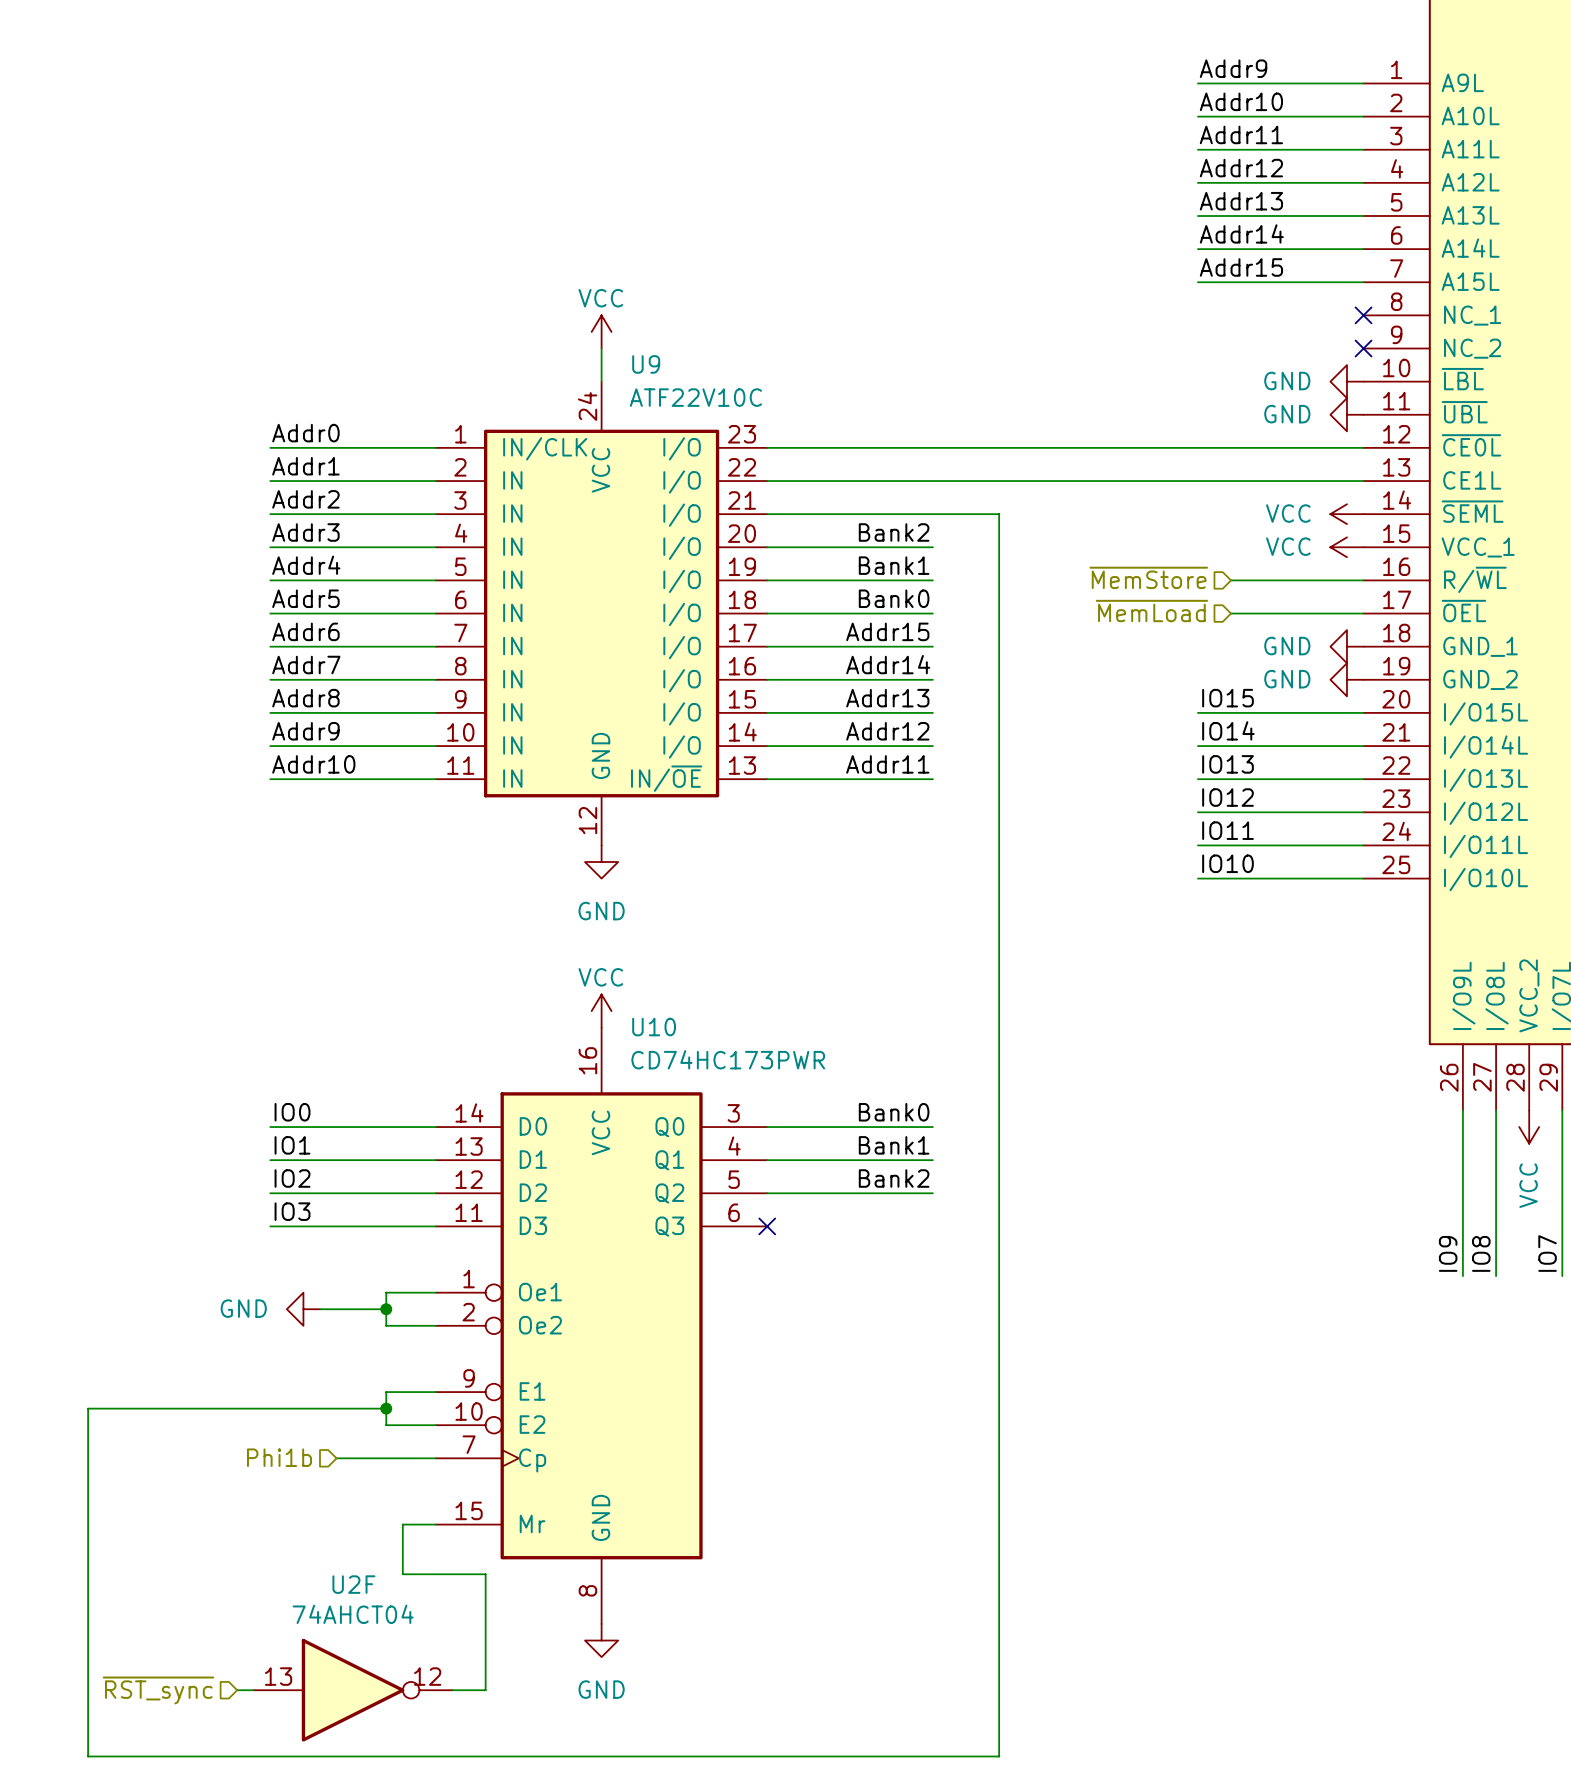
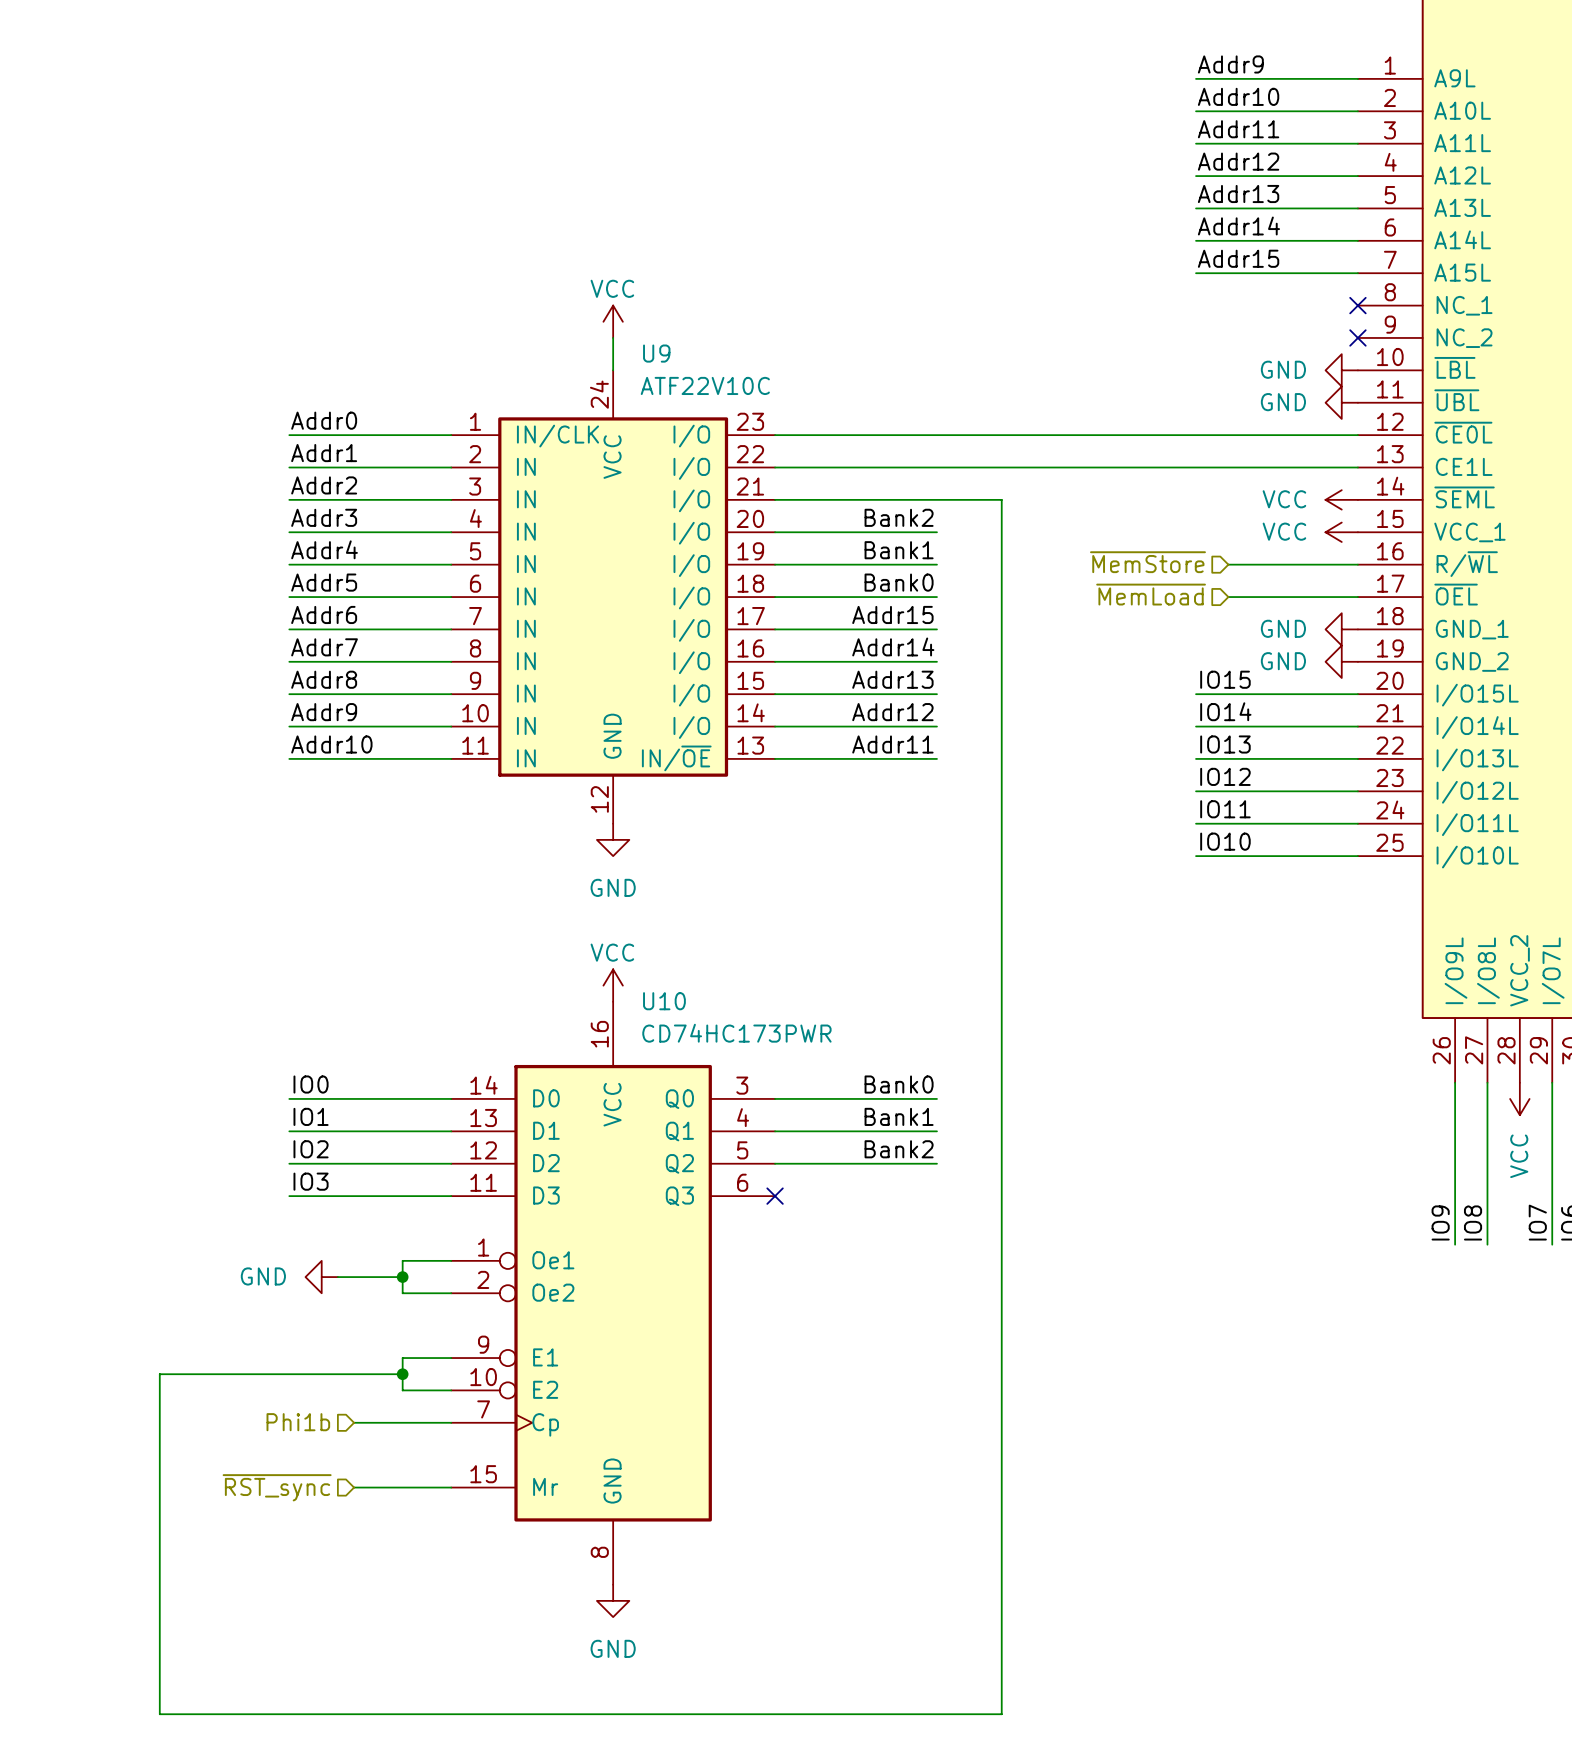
wire: (137, 1408) (88, 1408) (88, 1756) (137, 1756) -> (159, 1374) (159, 1714)
wire: (402, 1524) (402, 1574) (485, 1574) (485, 1690) (452, 1690) -> (418, 1487) (354, 1487)
hierarchical label position: ~{RST_sync} (158, 1690) -> ~{RST_sync} (277, 1487)
wire: (237, 1690) (253, 1690) -> none
U2F: 74AHCT04 (353, 1690) -> none

